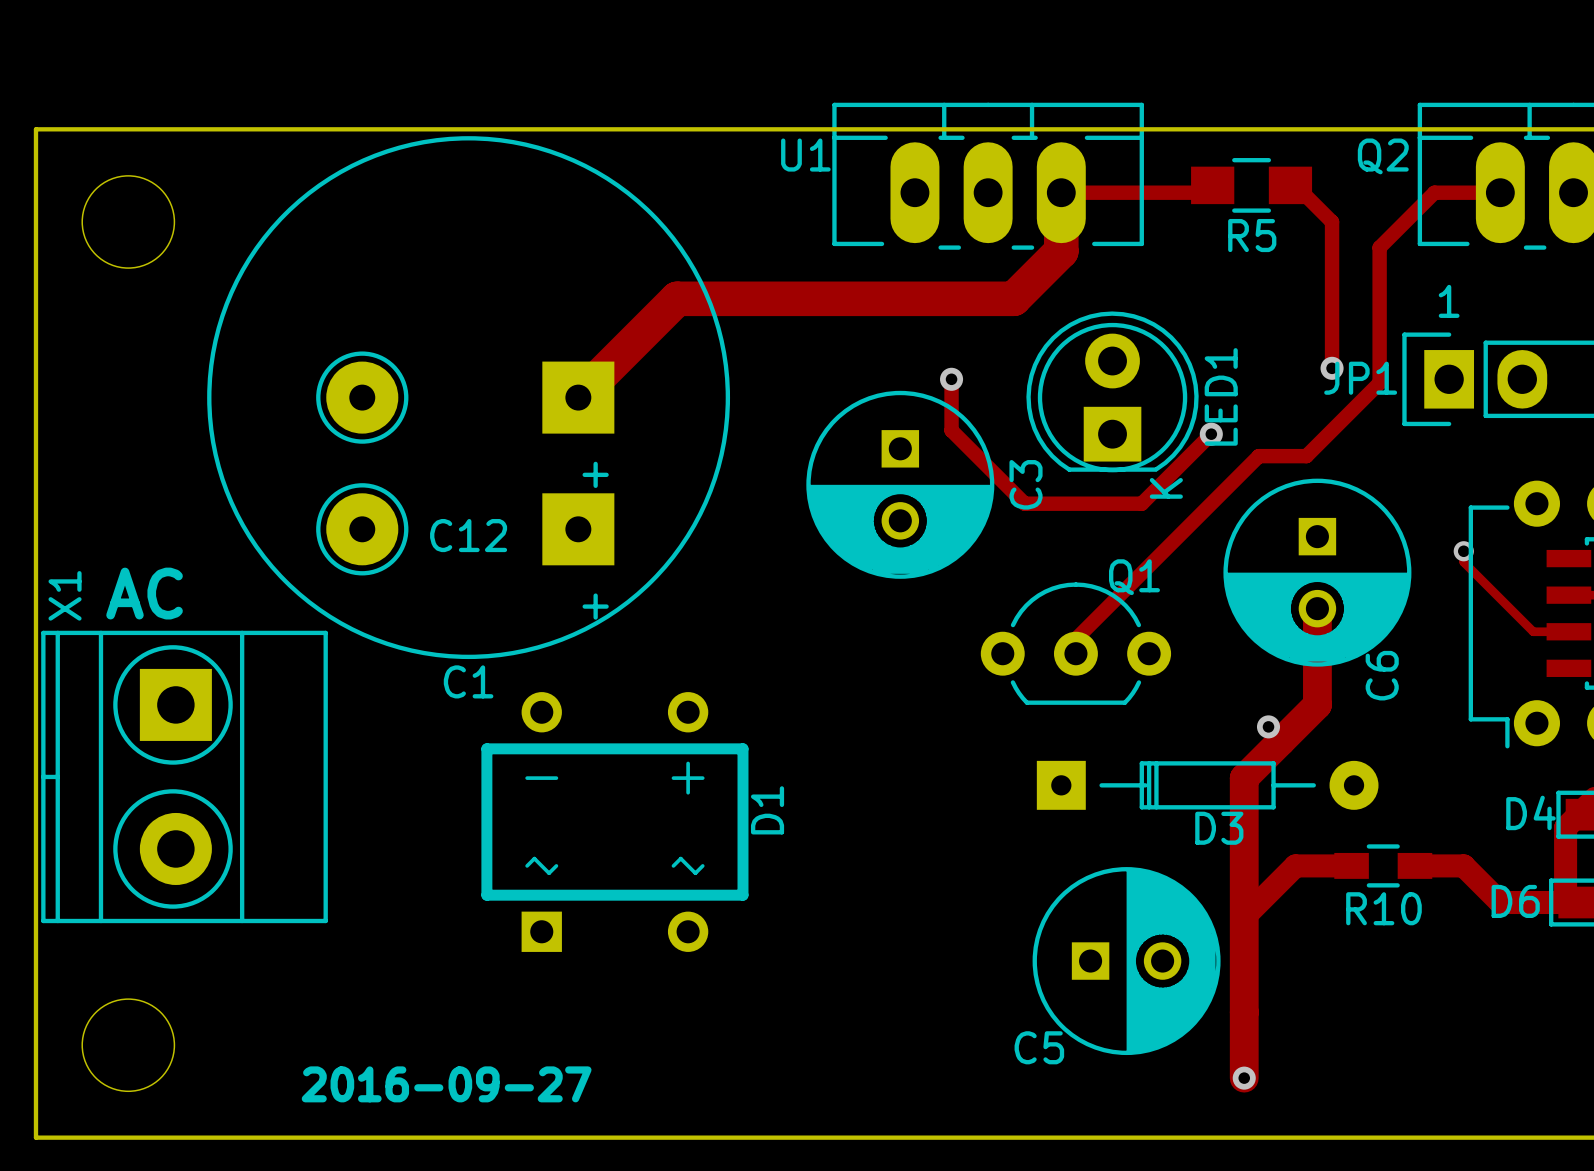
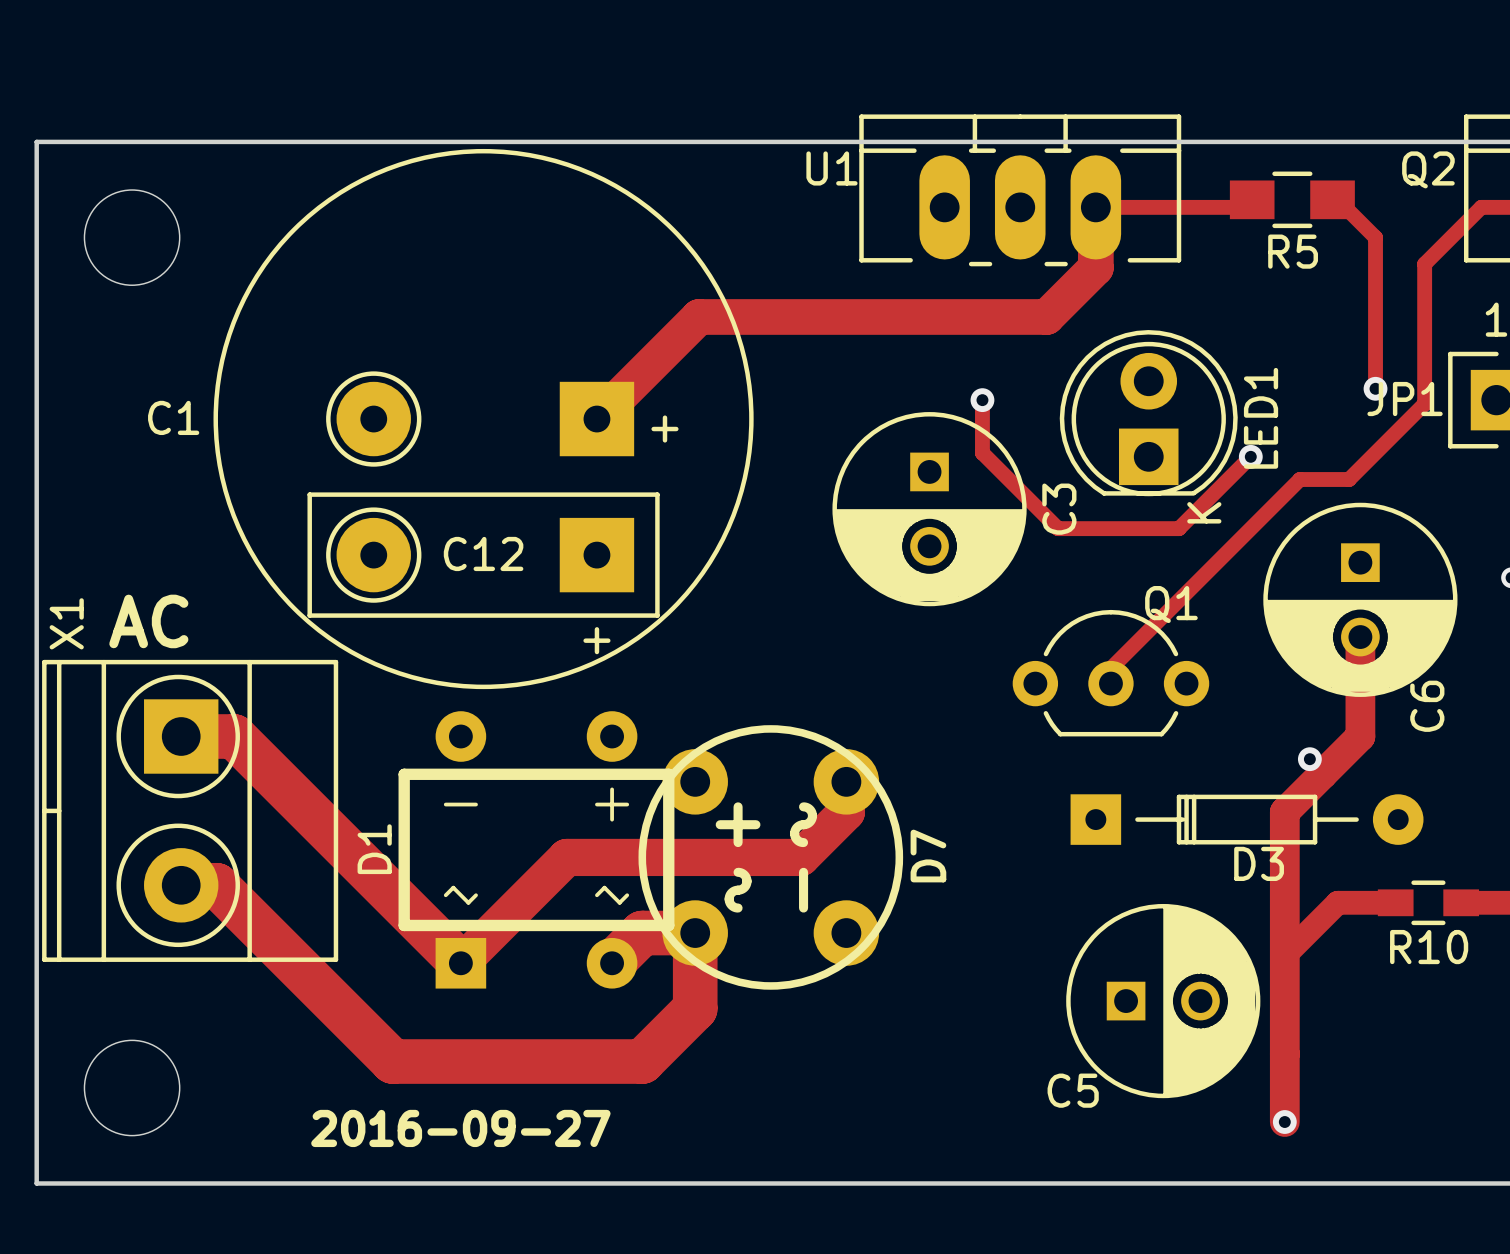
C1 text position: + (595, 474) -> + (664, 429)
C12 footprint: [316, 483, 615, 576] -> [307, 492, 660, 618]
C1 name position: C1 (468, 681) -> C1 (173, 417)
D1 footprint: [481, 692, 749, 952] -> [398, 711, 675, 989]
track: none -> (181, 736) (234, 736) (460, 963) (566, 857) (801, 857) (846, 812) (846, 781)
D1 name position: D1 (767, 810) -> D1 (374, 849)
D7: none -> (770, 857)
track: none -> (181, 885) (216, 885) (392, 1061) (642, 1061) (695, 1008) (695, 933) (642, 933) (612, 963)

